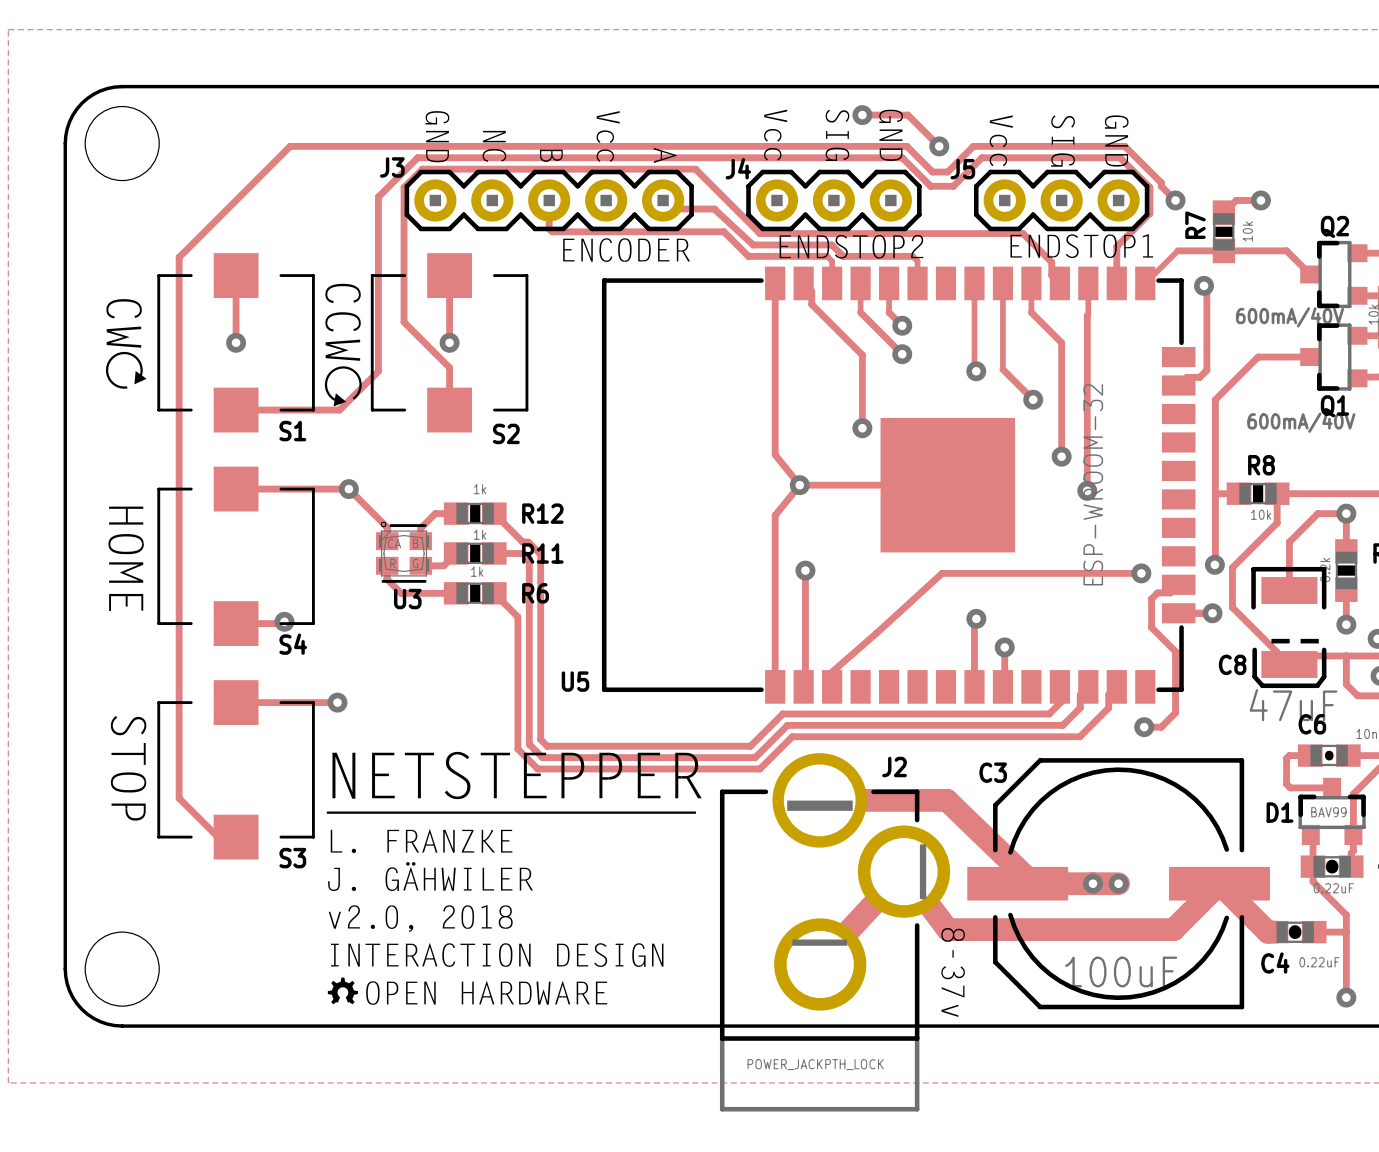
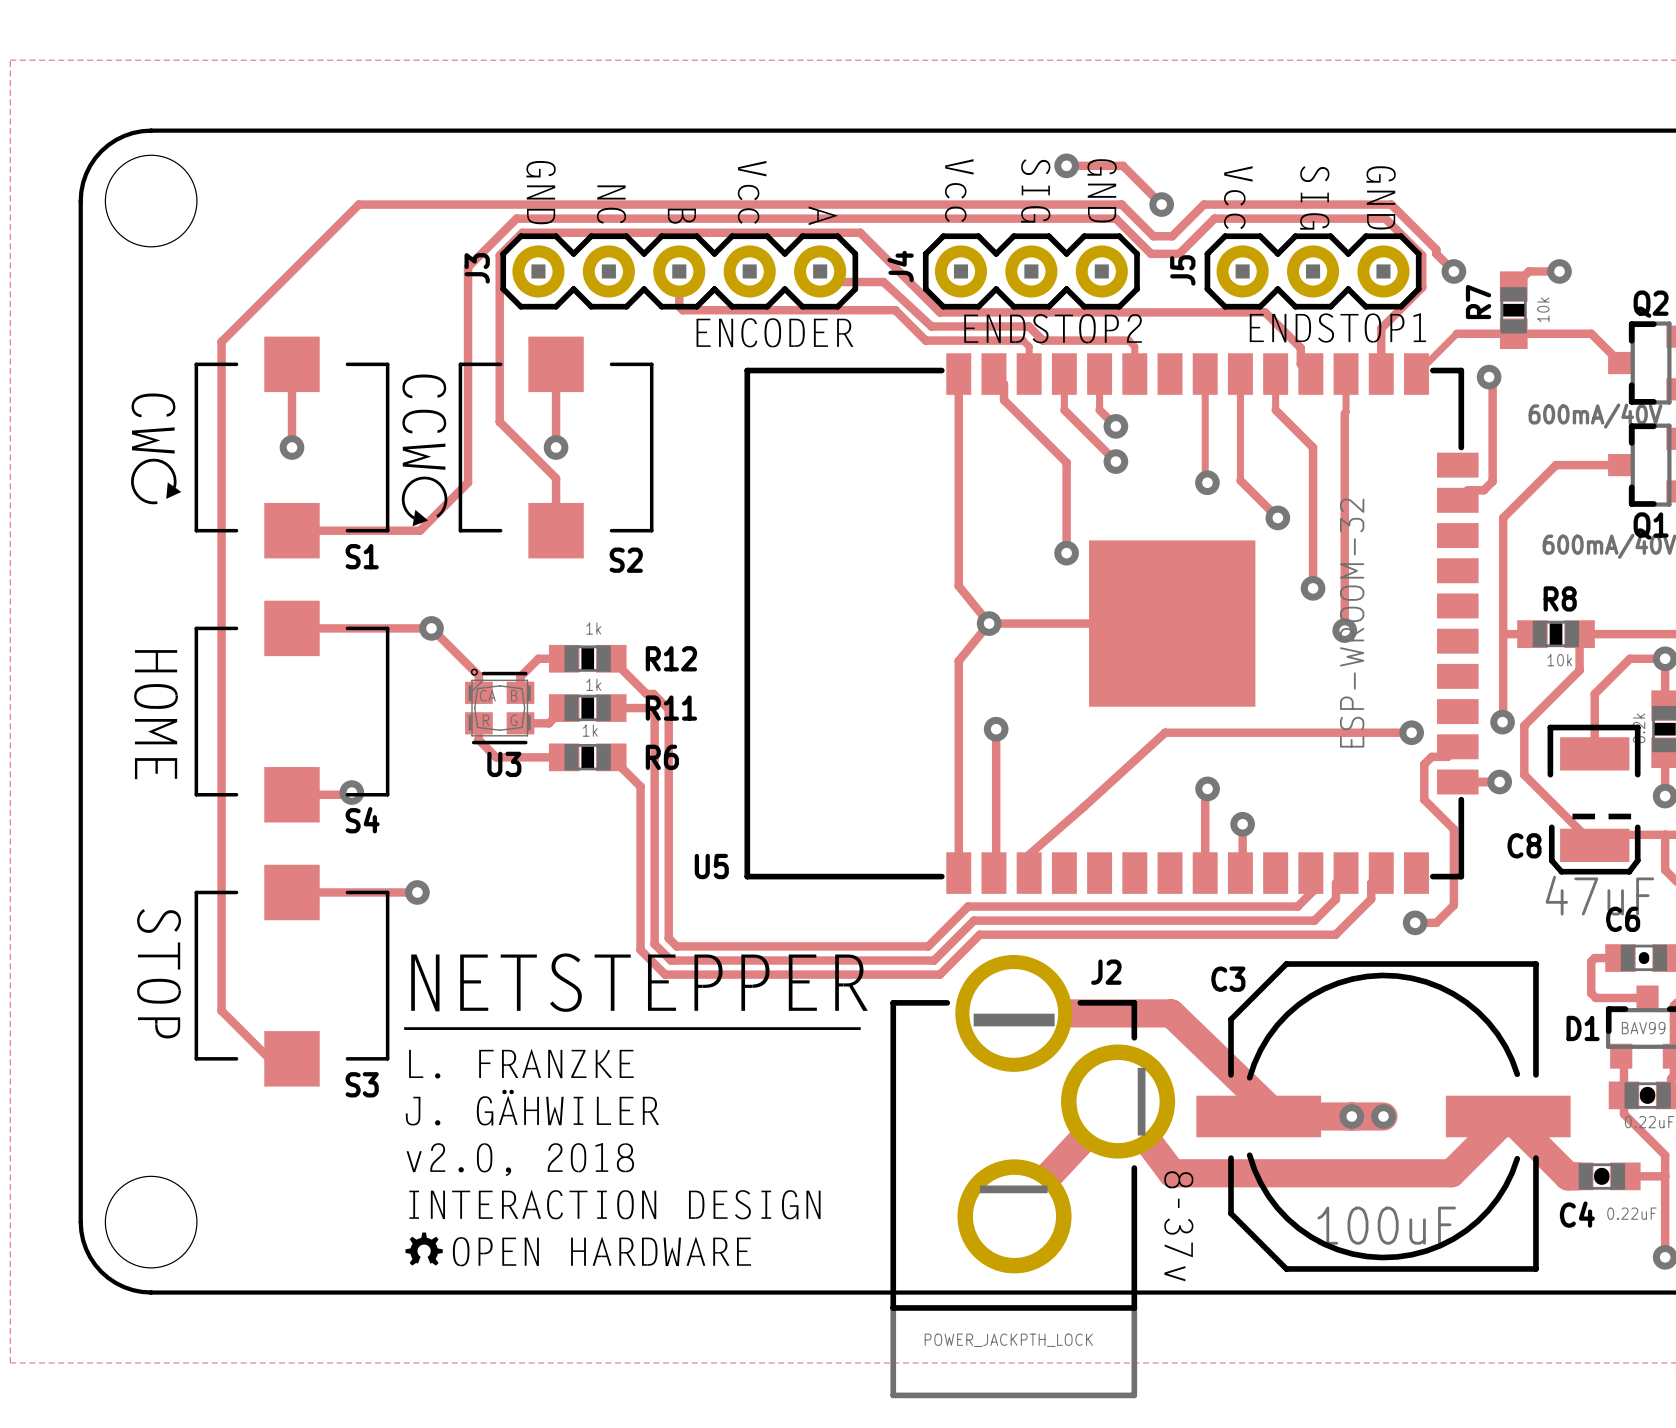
J3 name rotation: 0° (392, 167) -> 90° counterclockwise (477, 268)
J4 name rotation: 0° (738, 168) -> 90° counterclockwise (900, 266)
J5 name rotation: 0° (962, 169) -> 90° counterclockwise (1182, 270)

